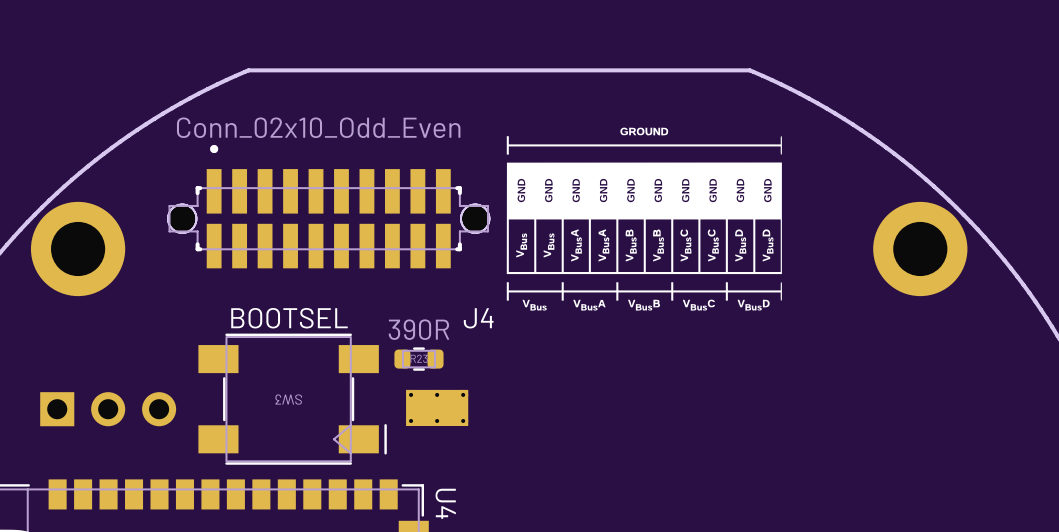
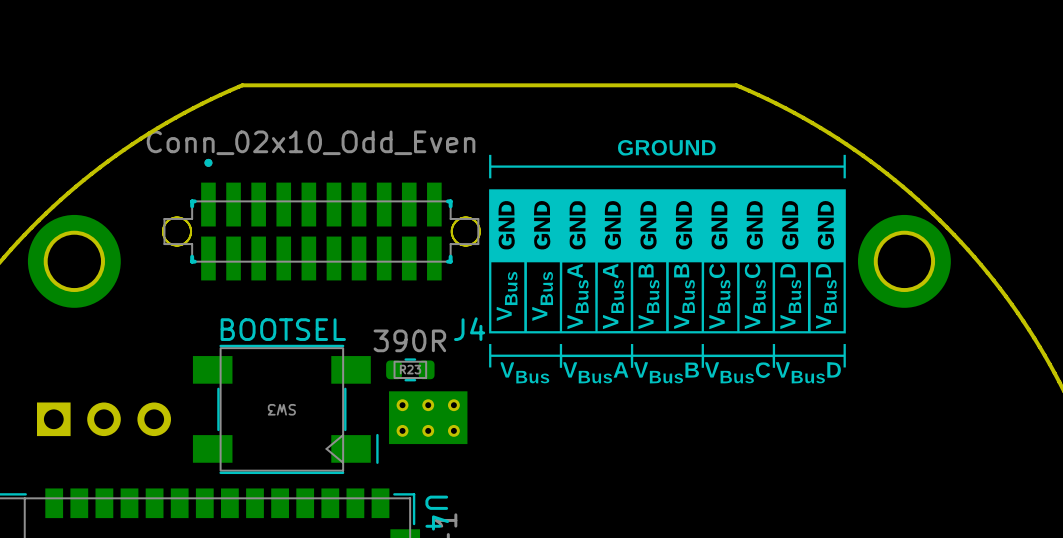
drawing: none -> [489, 140, 846, 384]
drawing: [506, 127, 782, 311] -> none
part footprint: [406, 389, 469, 427] -> [388, 391, 468, 445]

